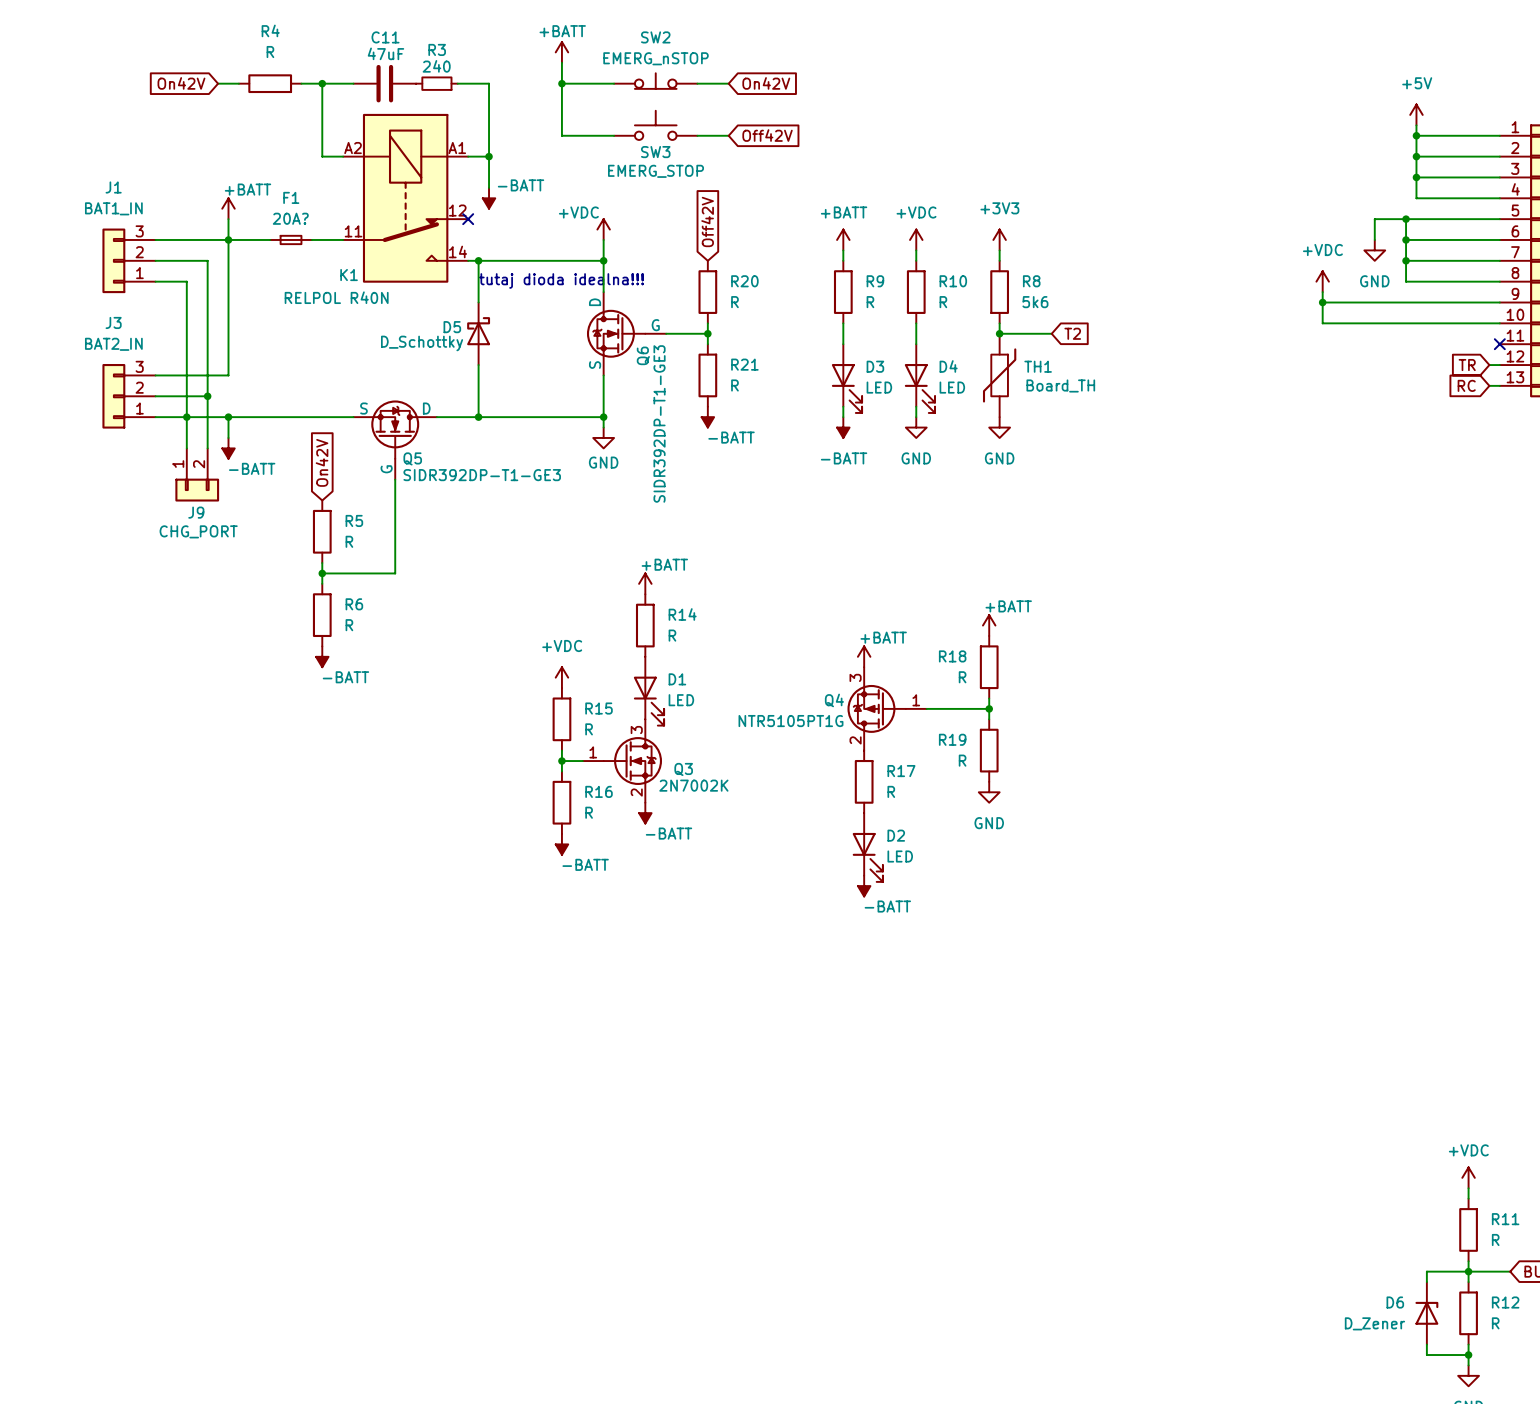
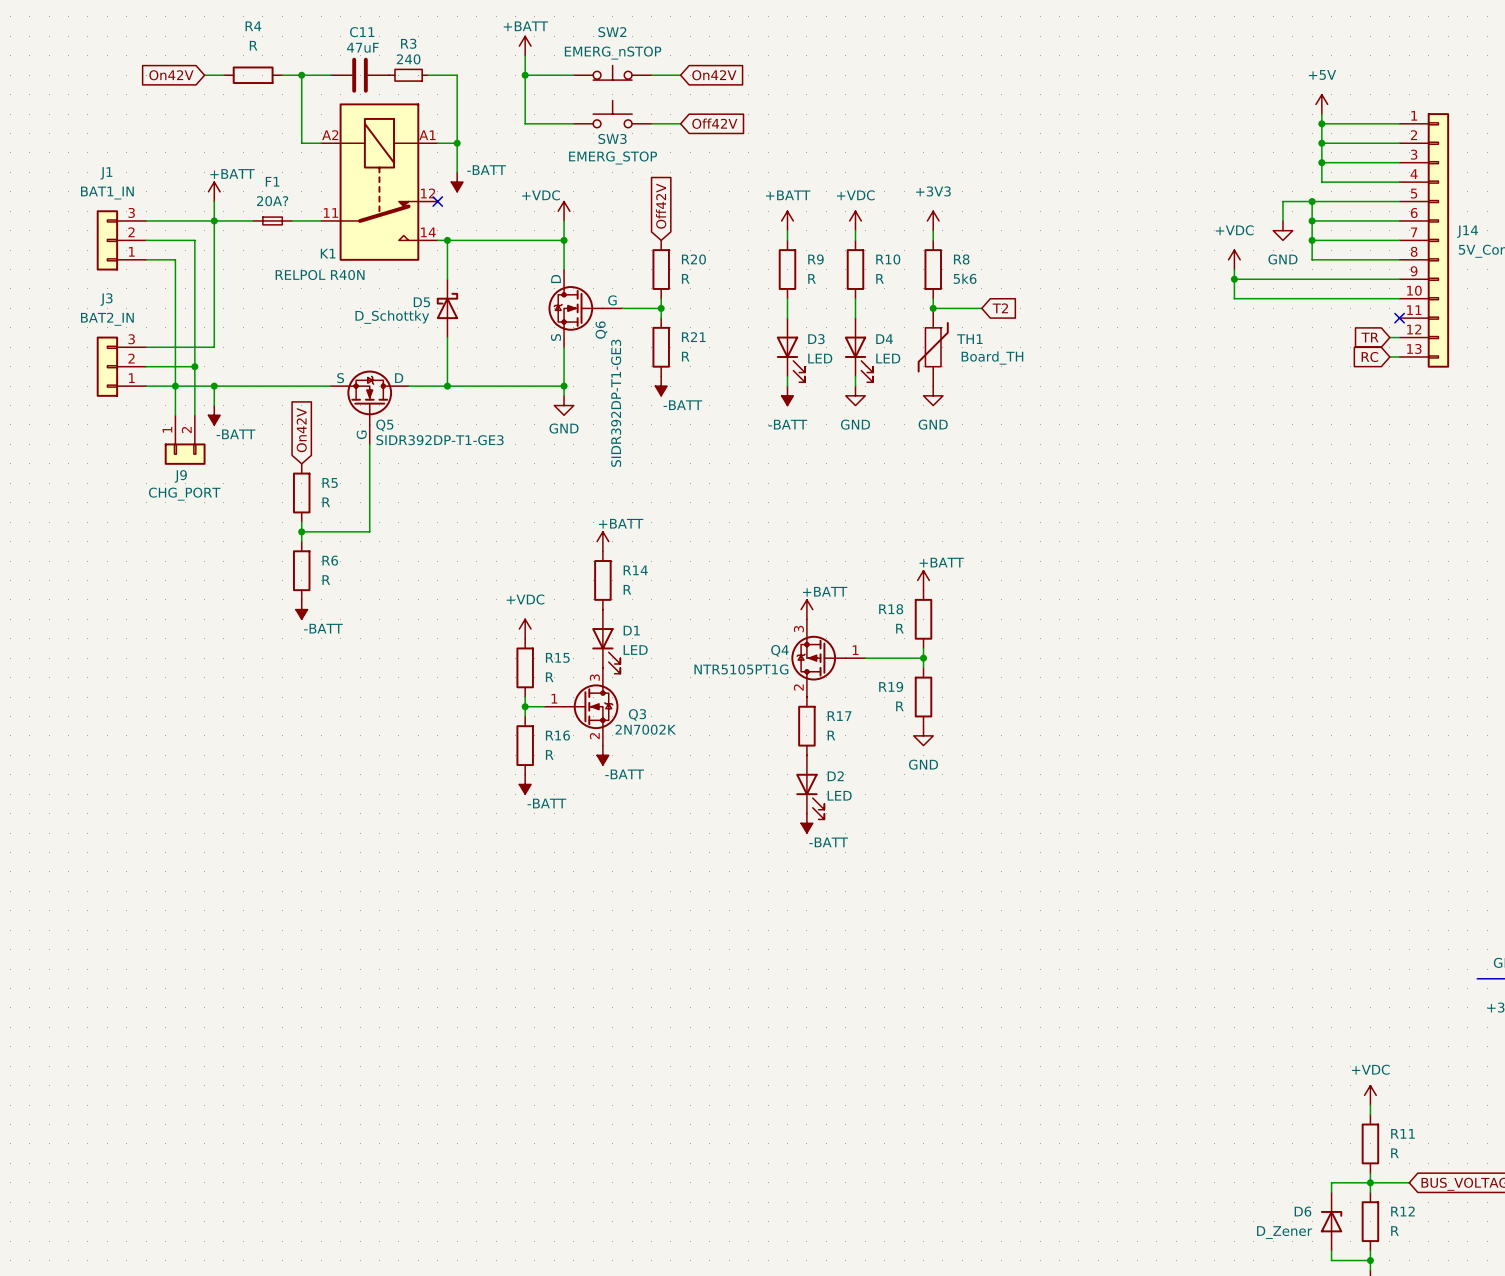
text: tutaj dioda idealna!!! (561, 280) -> none

